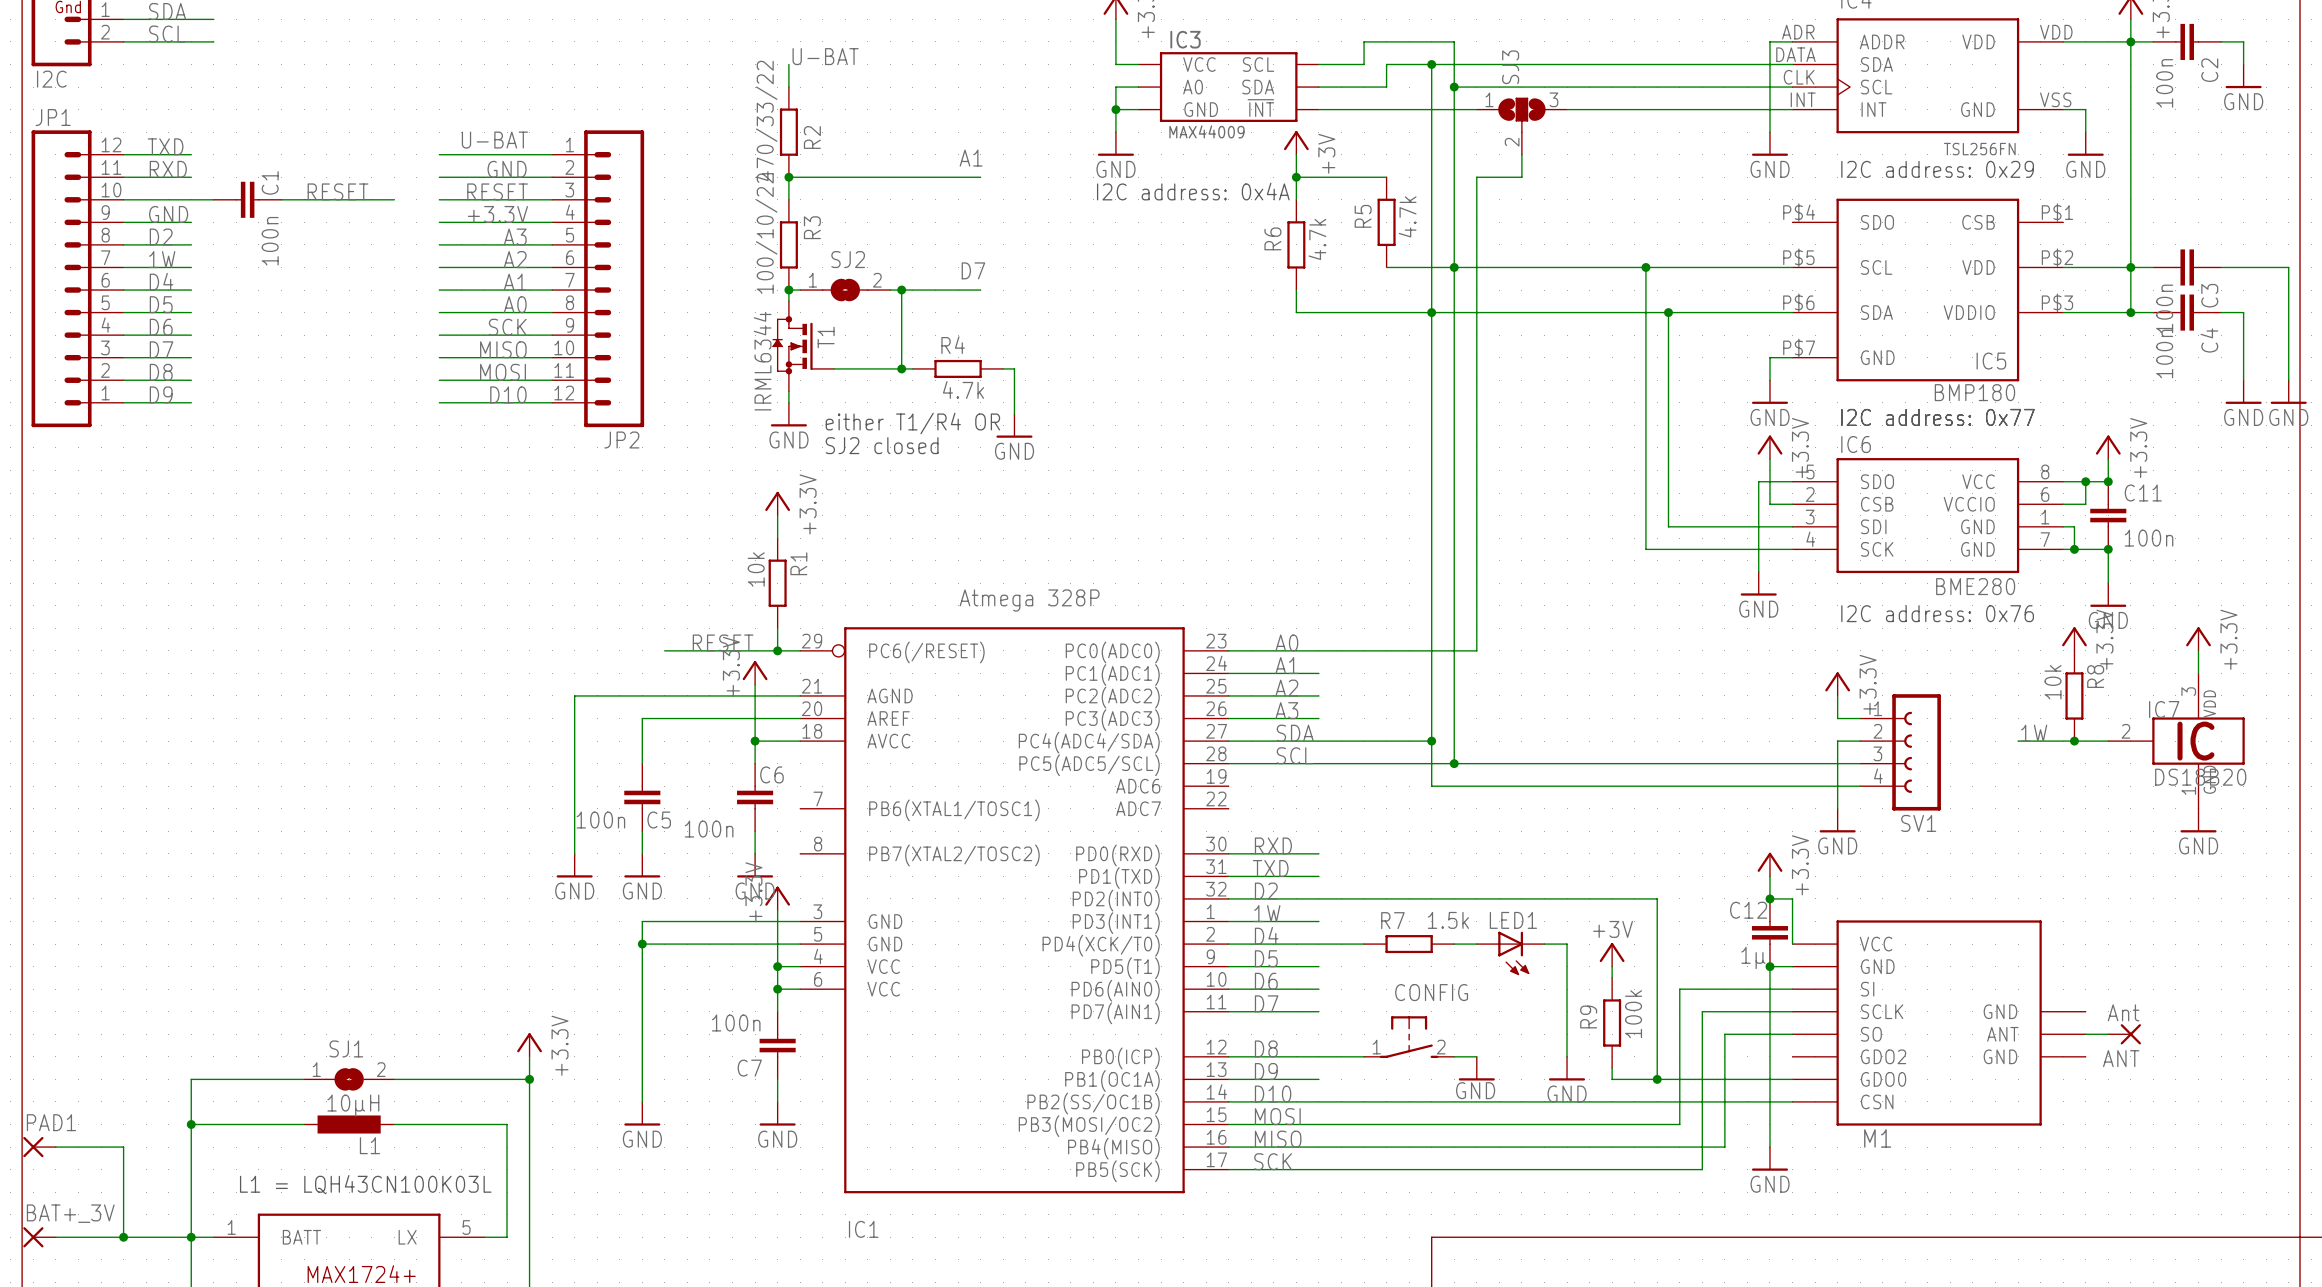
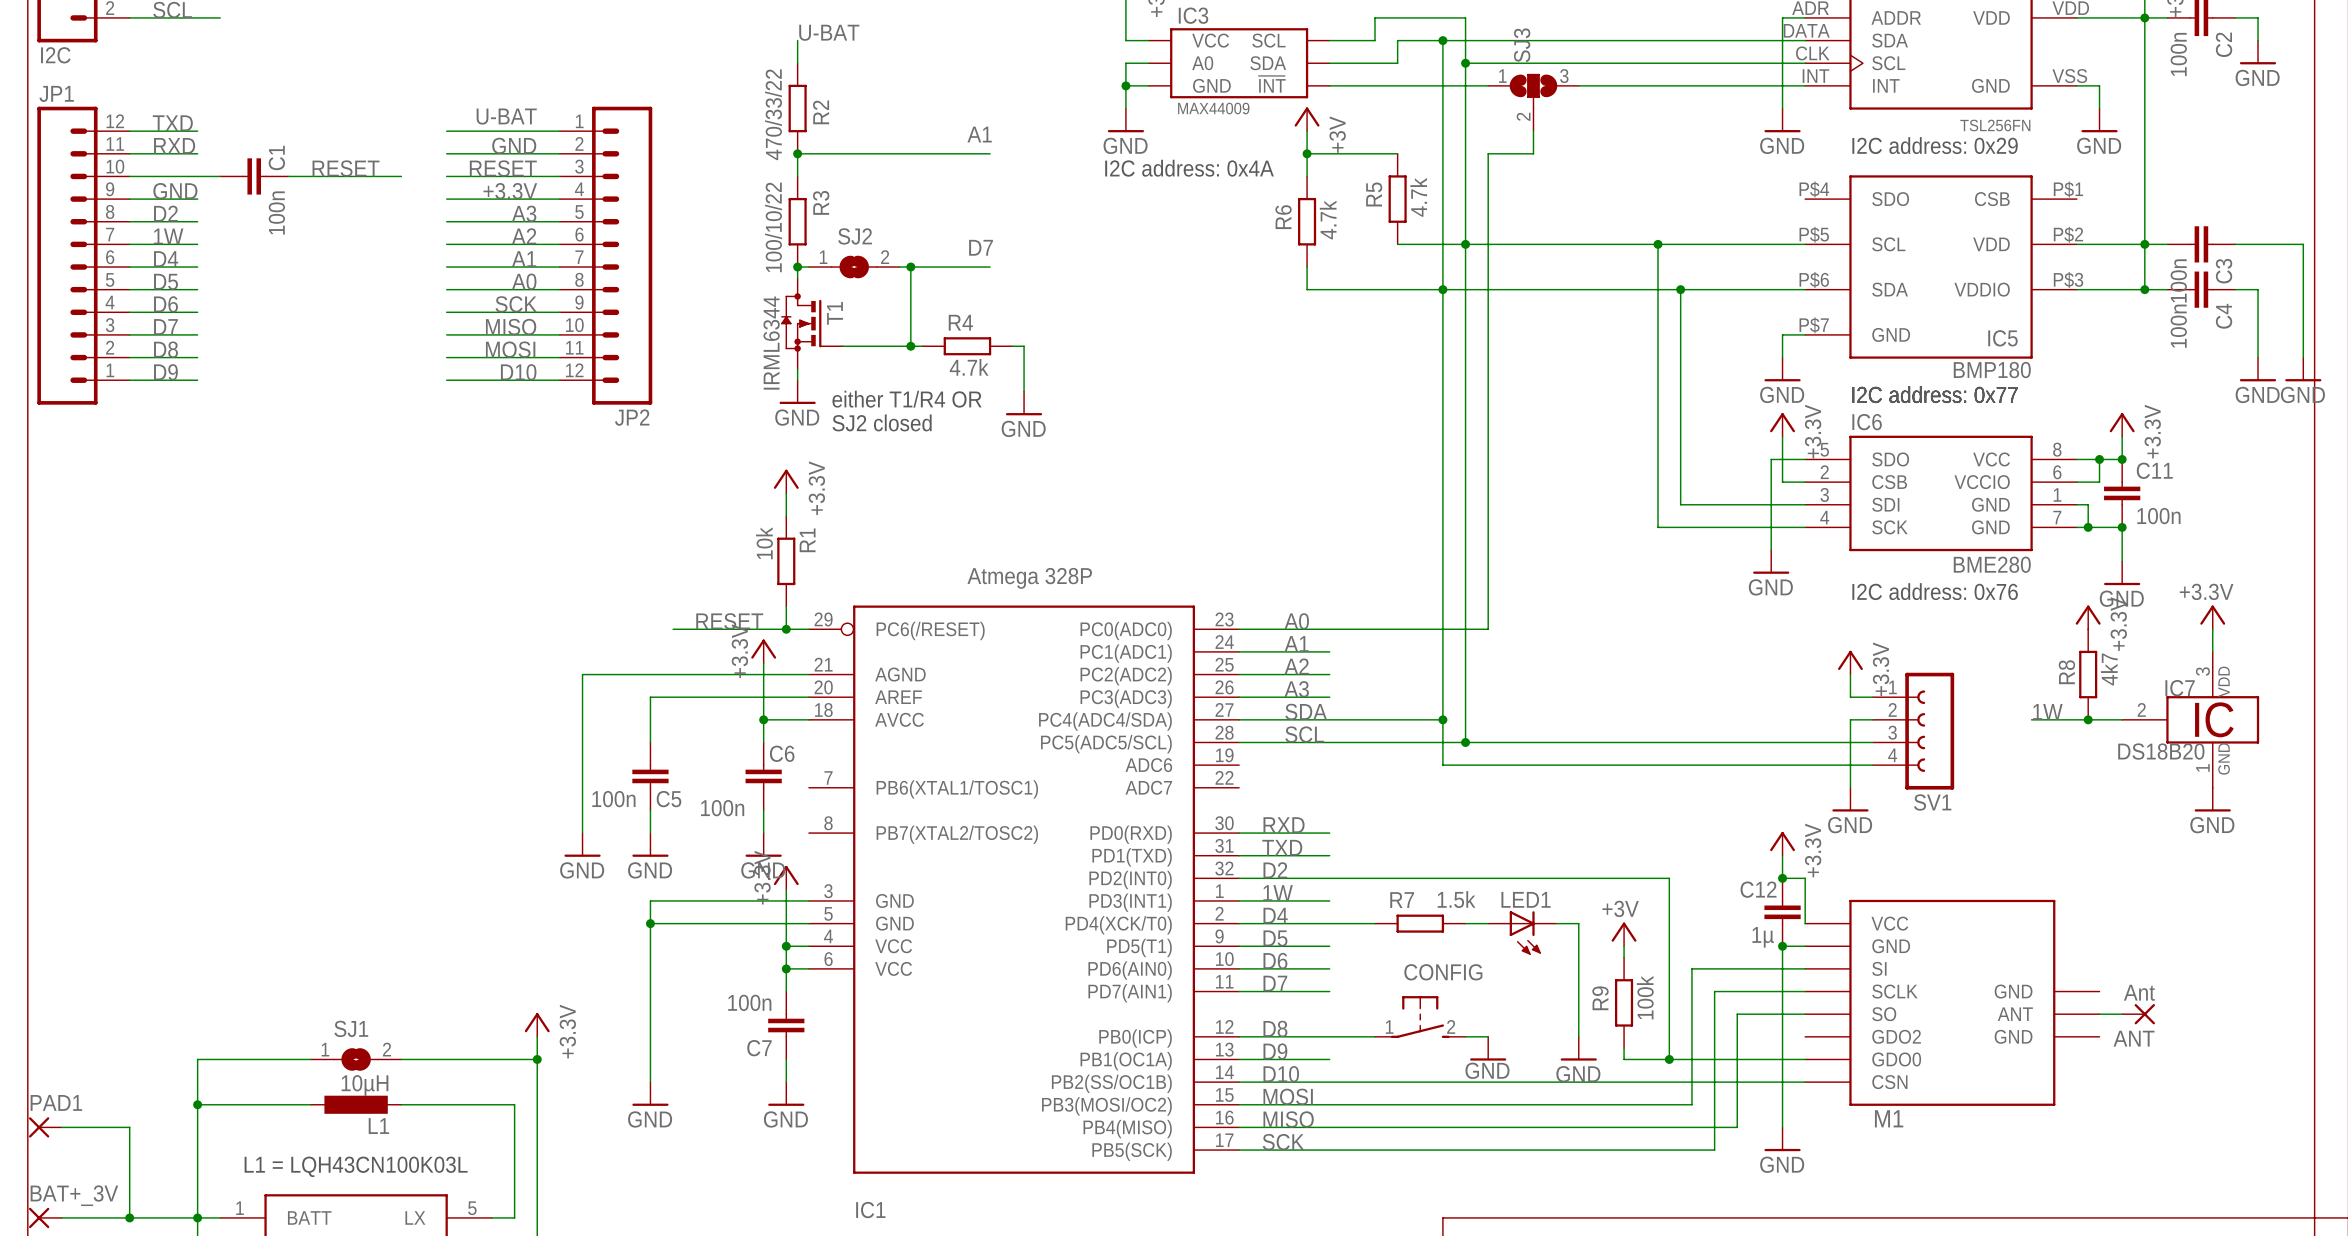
power symbol text rotation: 0° (2228, 639) -> 90° clockwise (2206, 591)
R8 name position: R8 (2095, 676) -> R8 (2066, 672)
R8 value: 10k (2053, 682) -> 4k7 (2109, 669)
IC7 value position: DS18B20 (2200, 777) -> DS18B20 (2161, 751)

